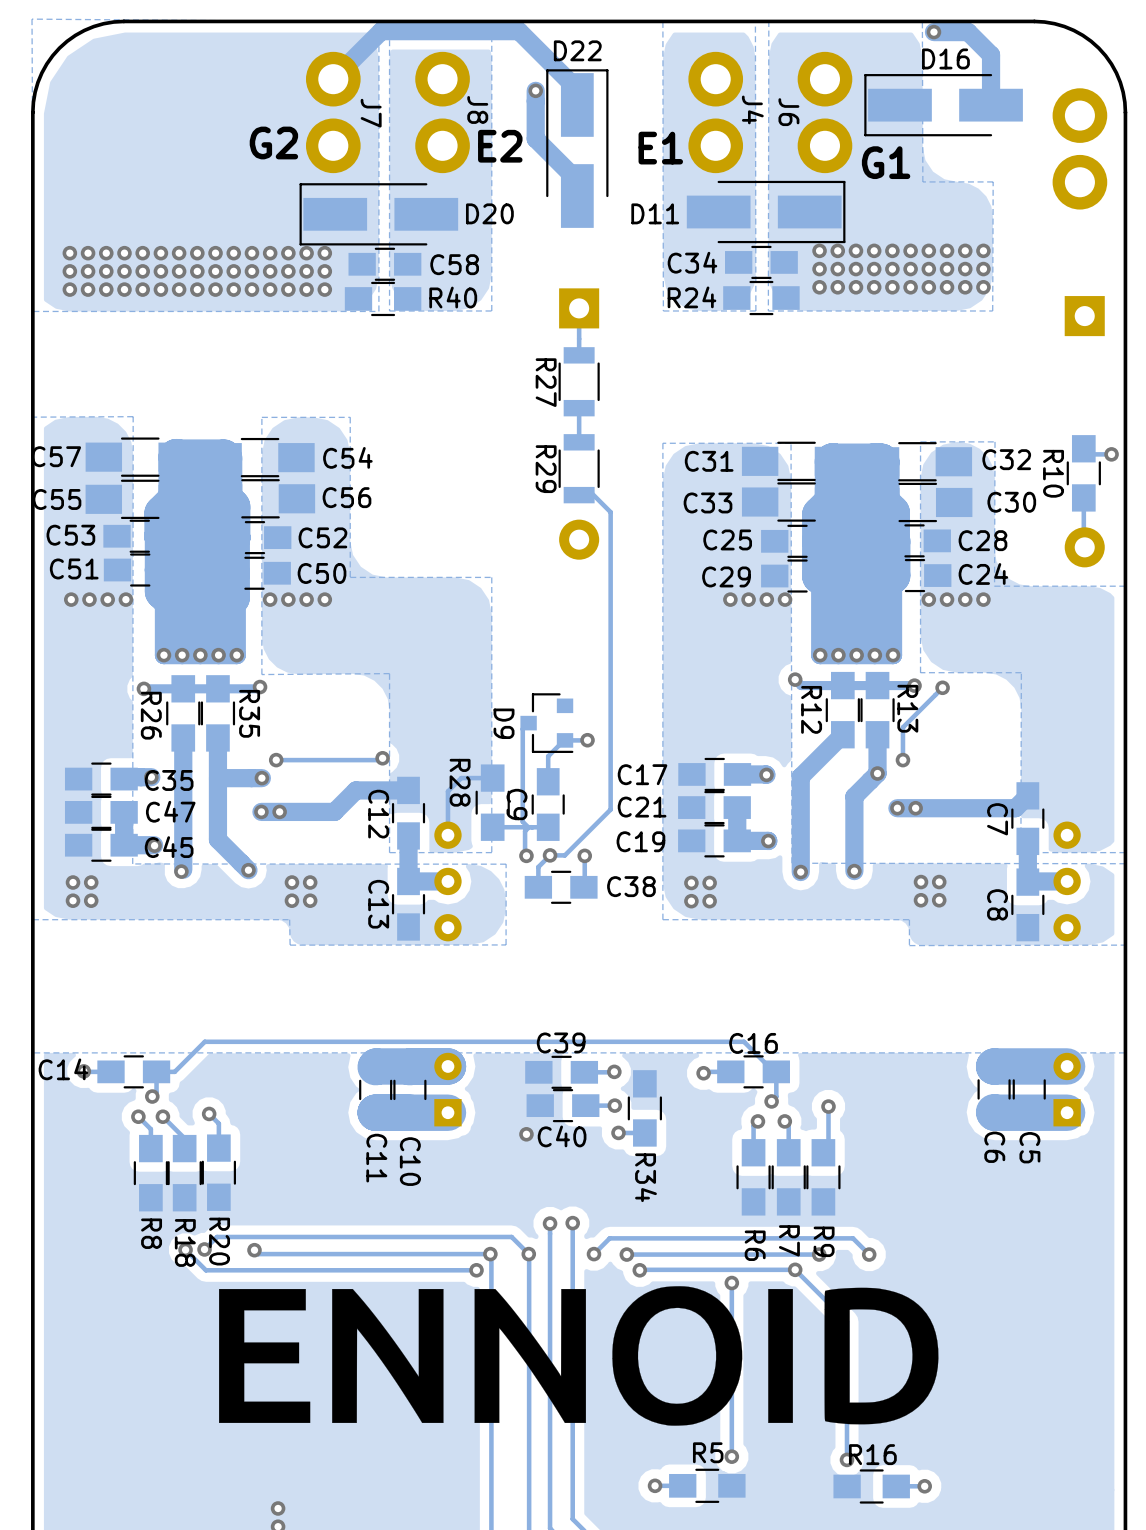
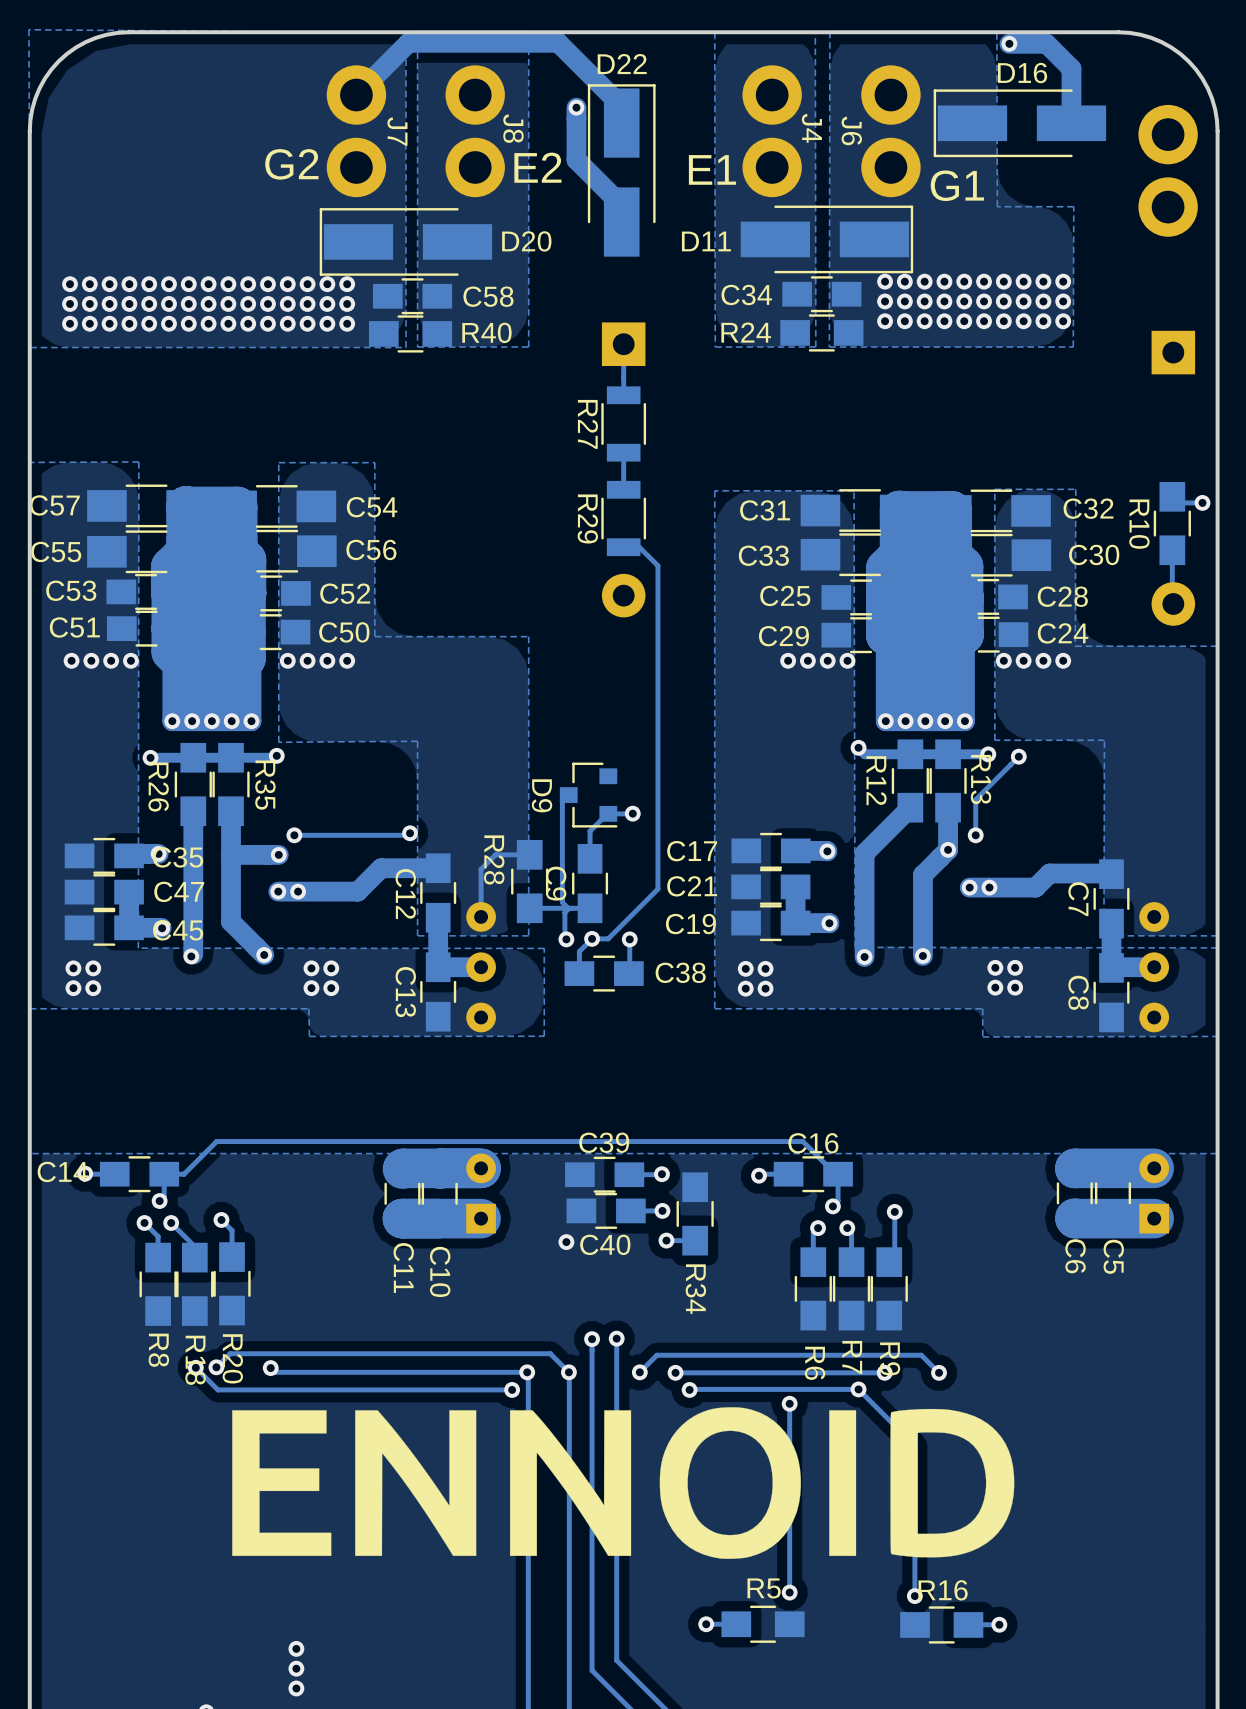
track: (1027, 795) (1015, 808) (958, 808) -> (1111, 874) (1049, 873) (1035, 887)

